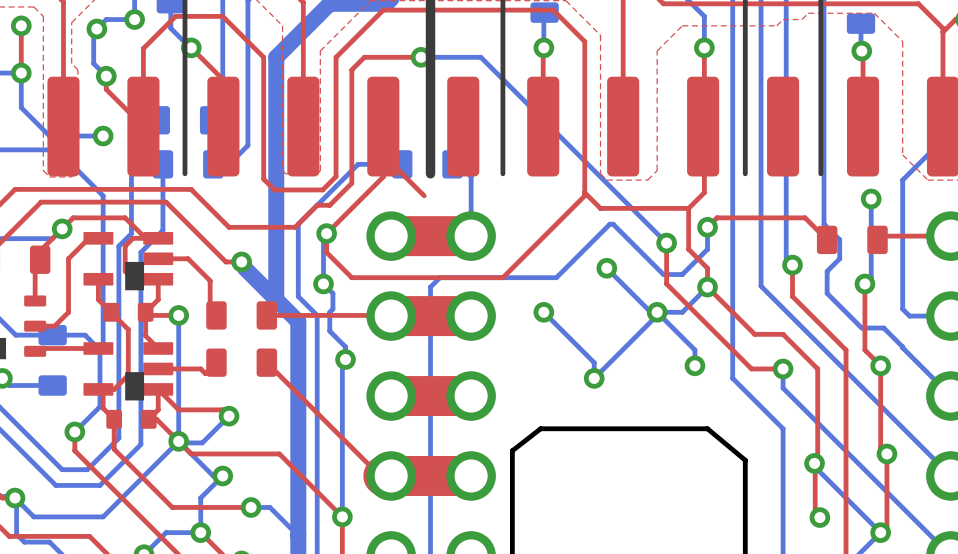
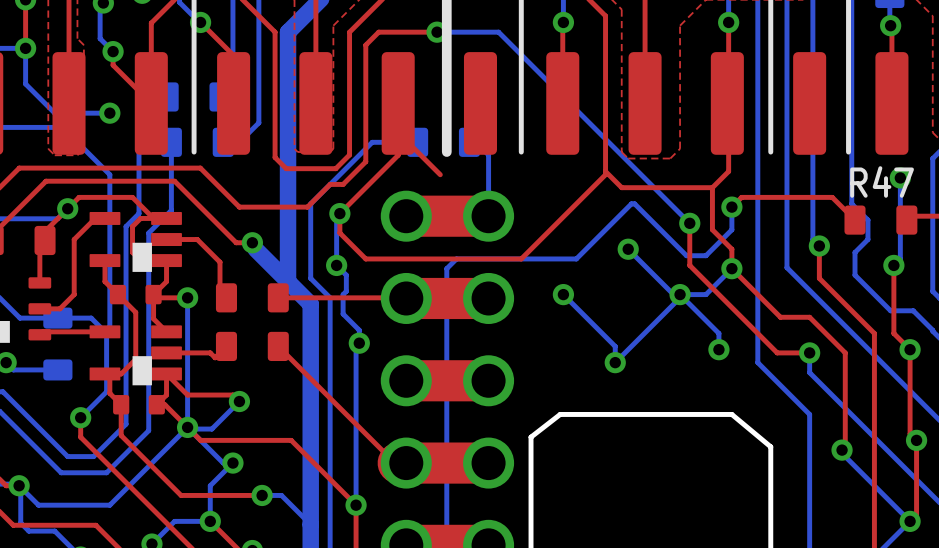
R47 name: none -> R47 (882, 181)
top track: (815, 462) (815, 512) (819, 517) -> none
via: (819, 517) -> none

